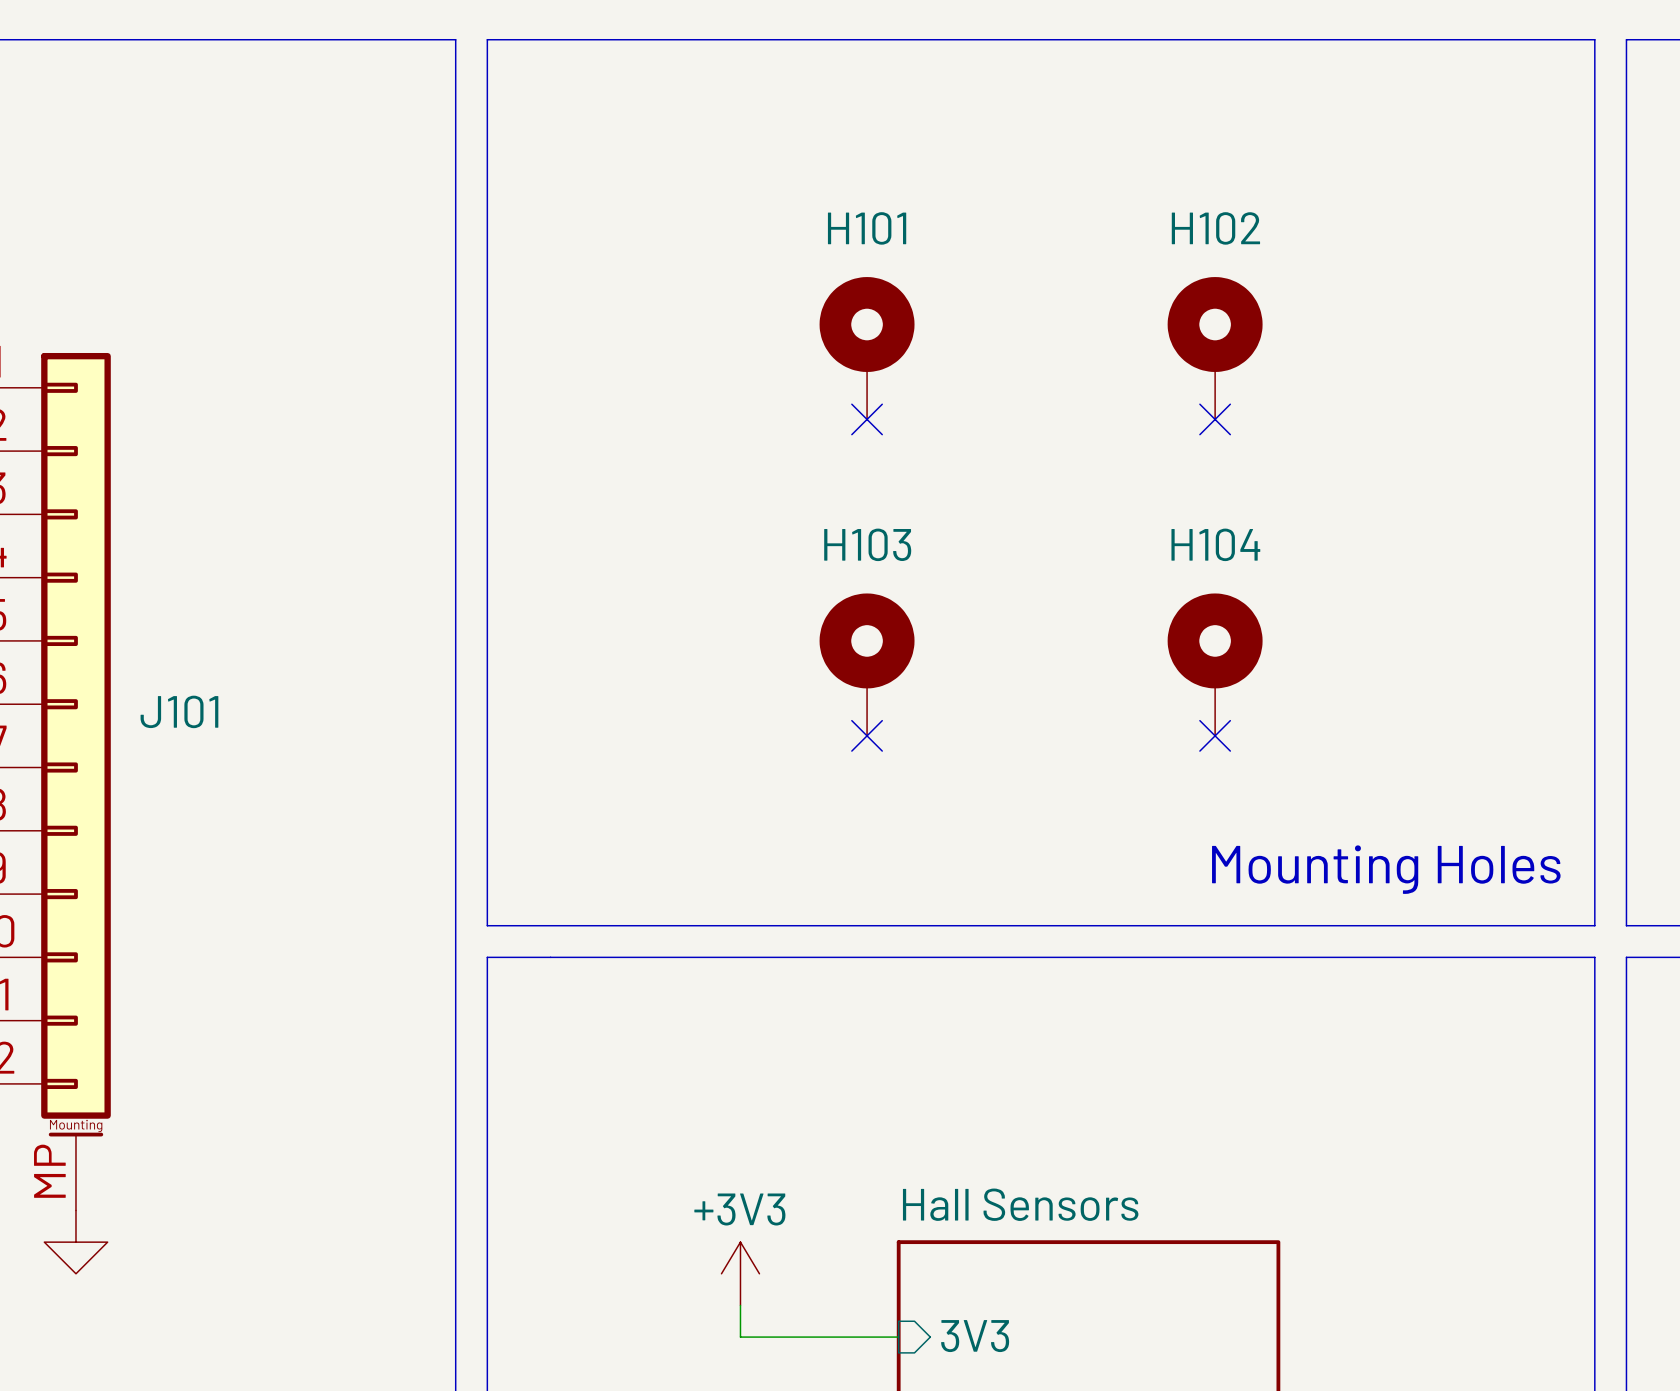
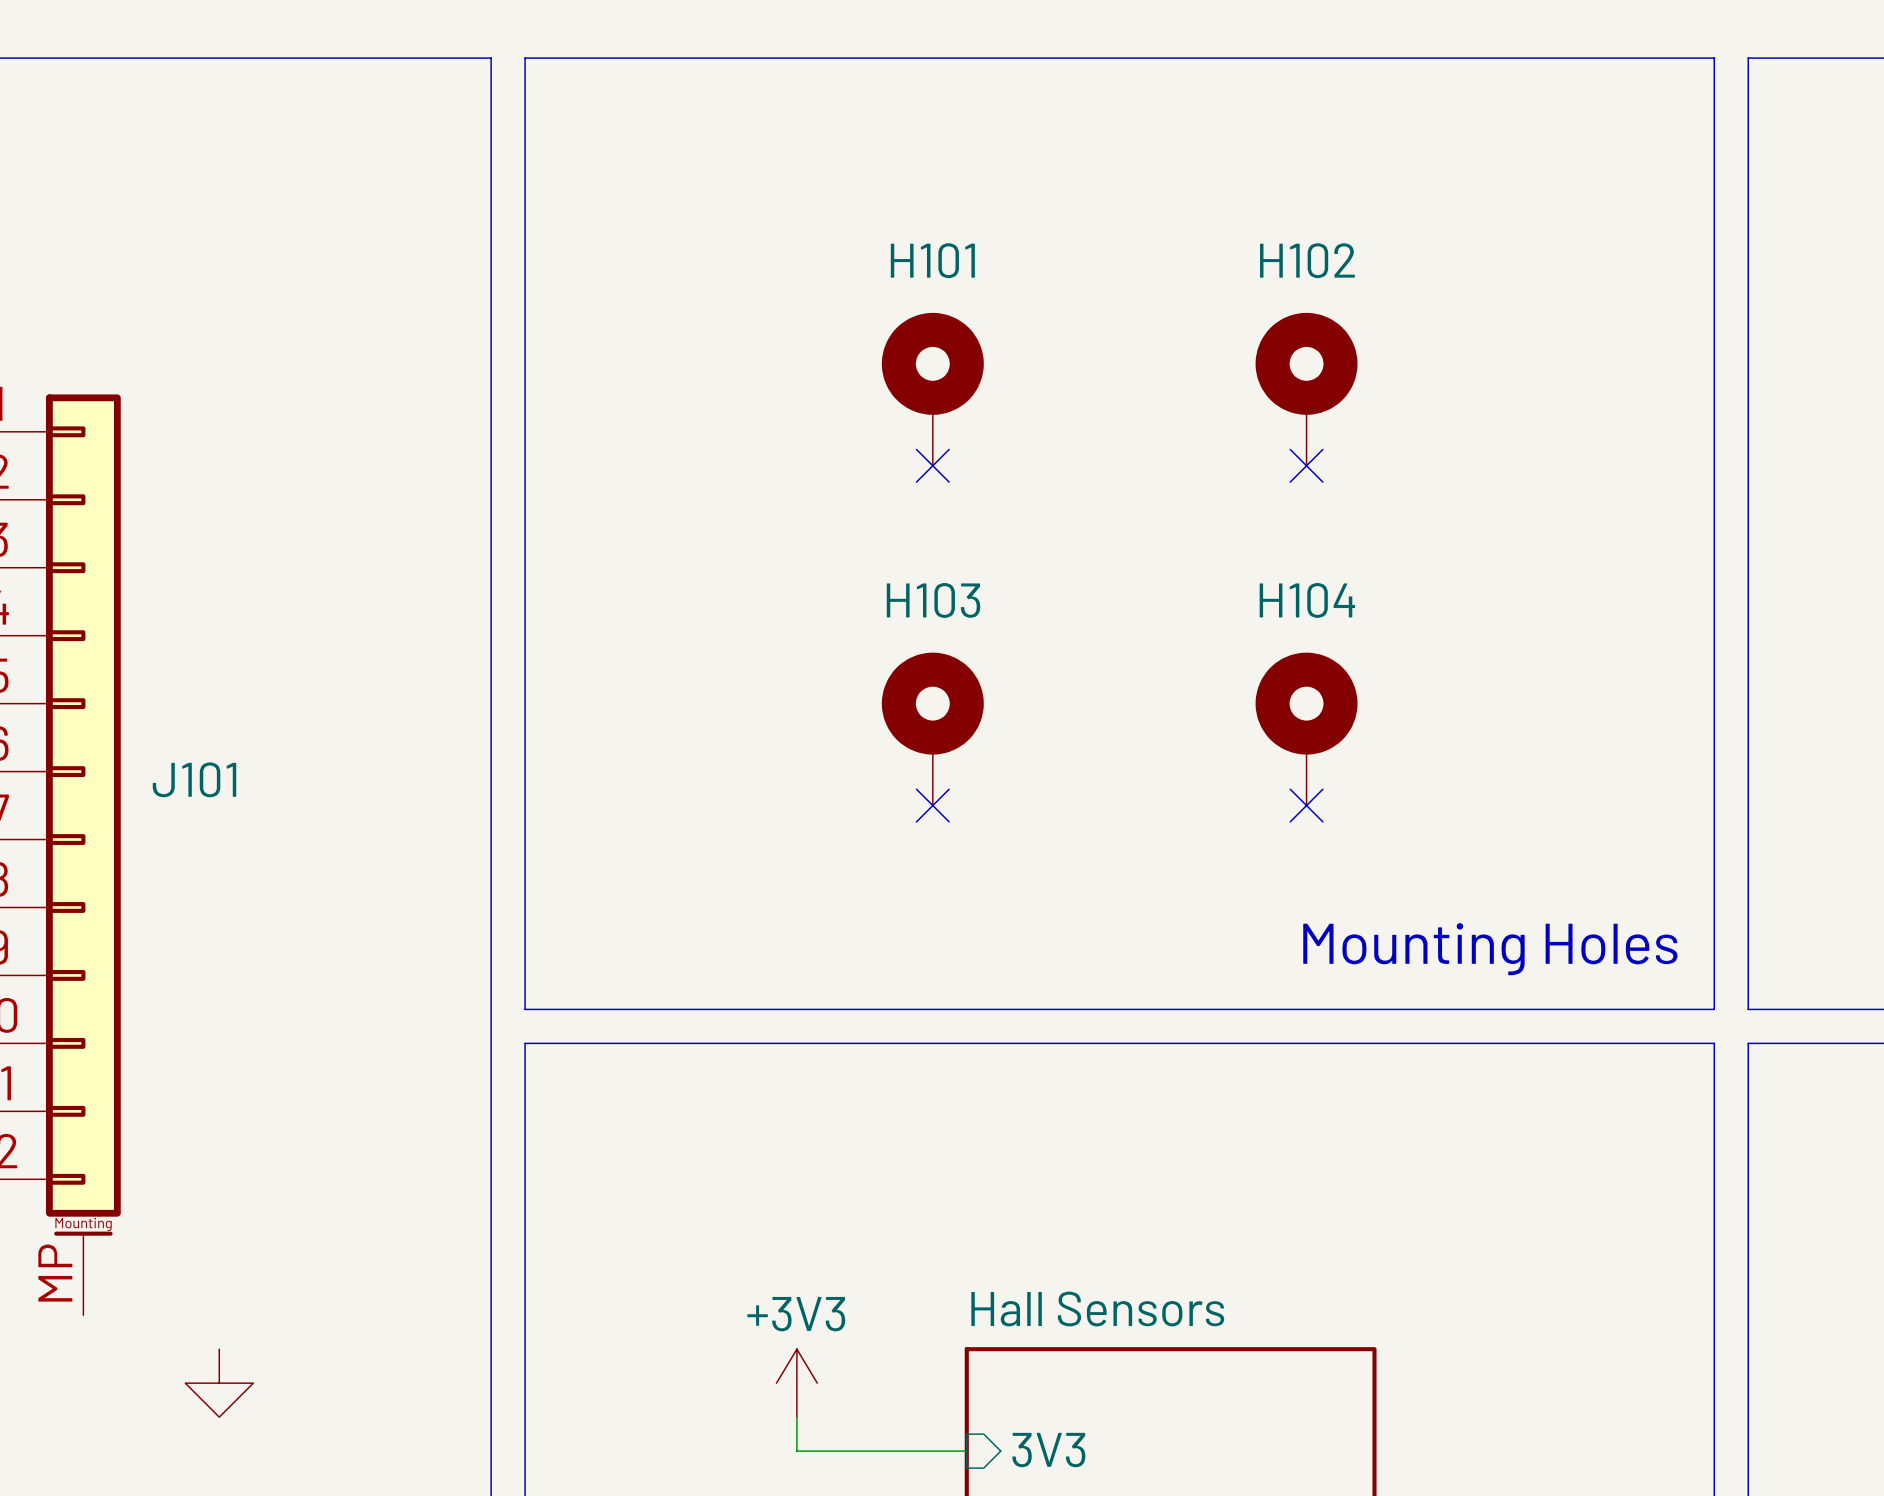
power symbol: (75, 1242) -> none
power symbol: none -> (219, 1383)

